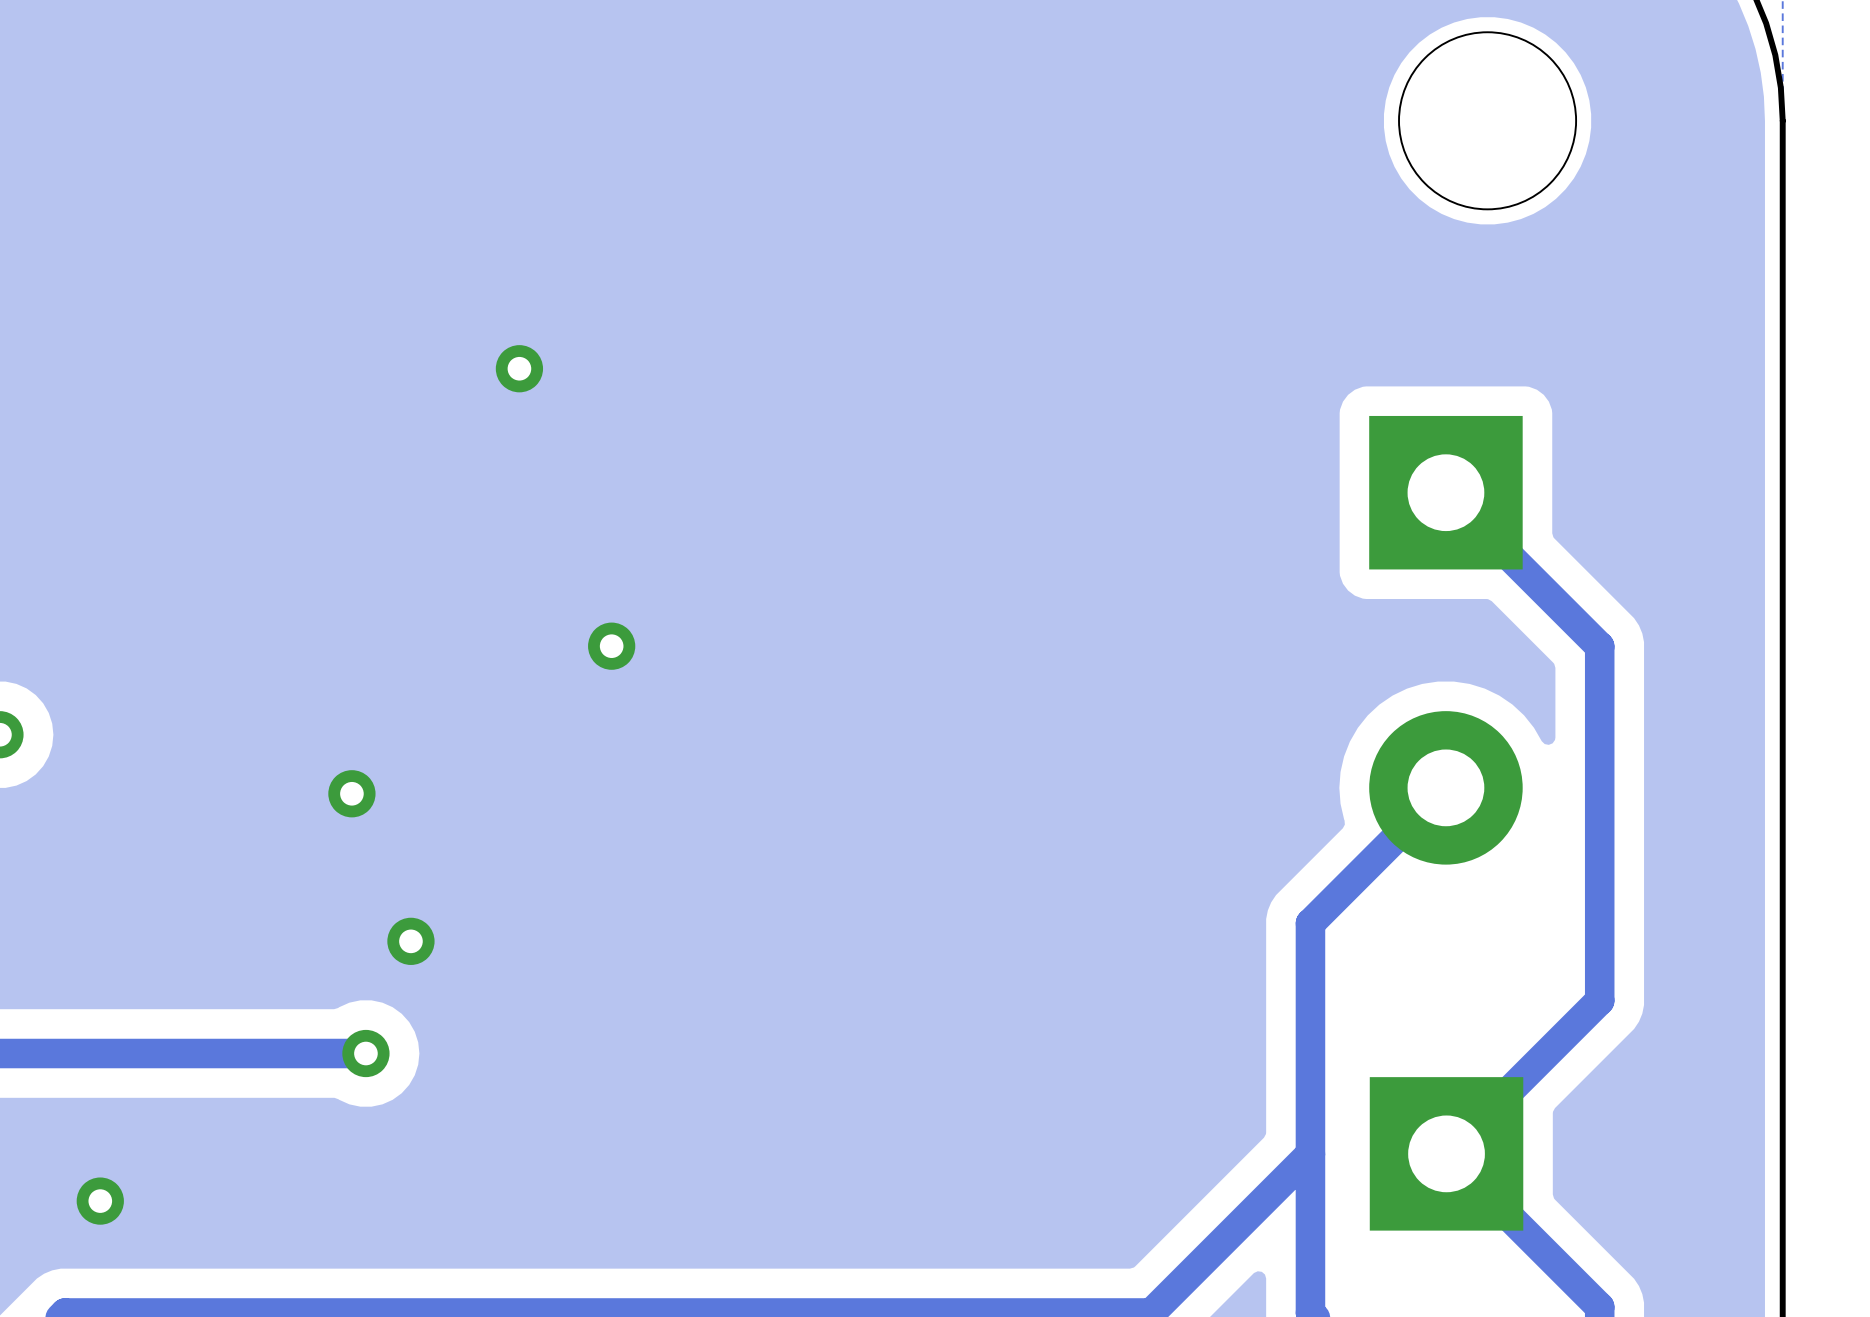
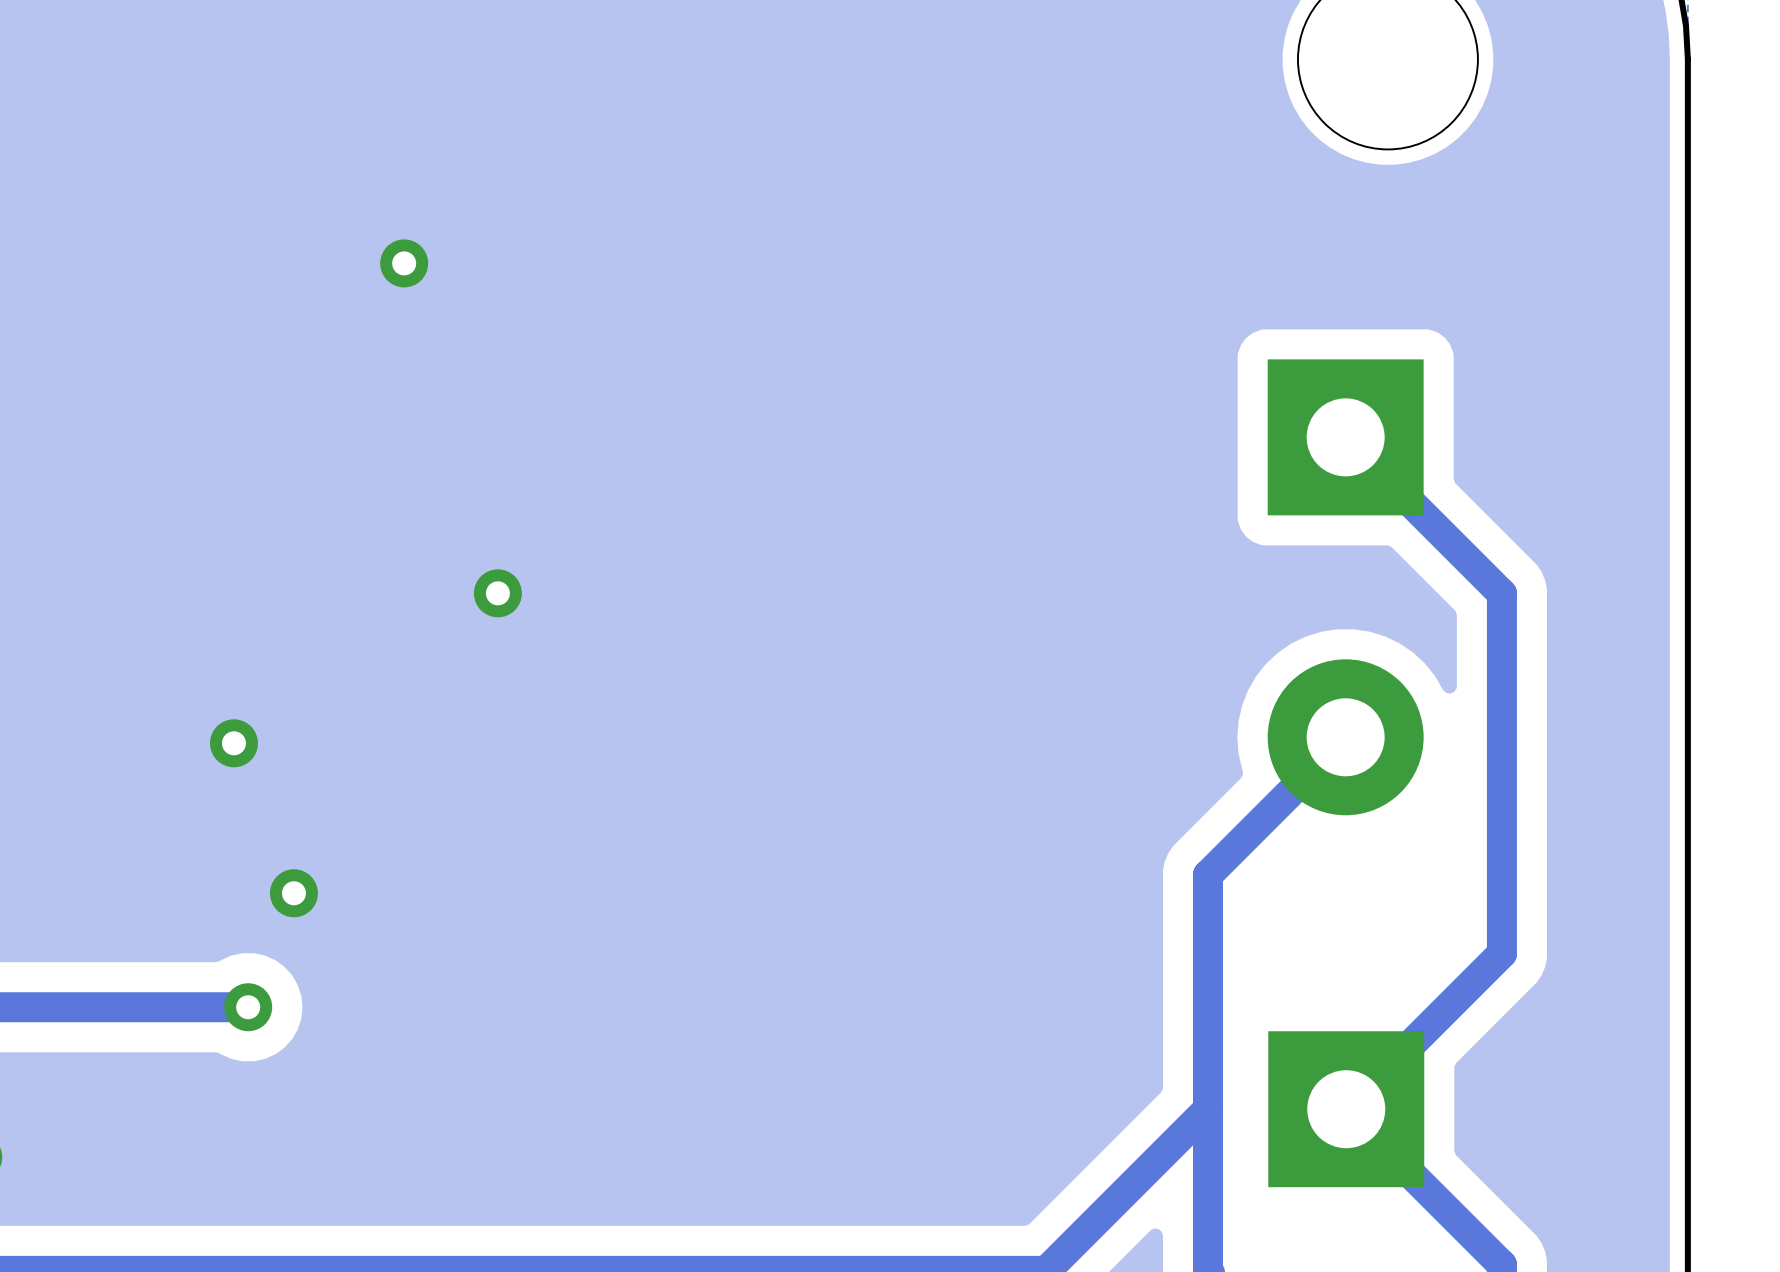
via position: (519, 368) -> (404, 263)

